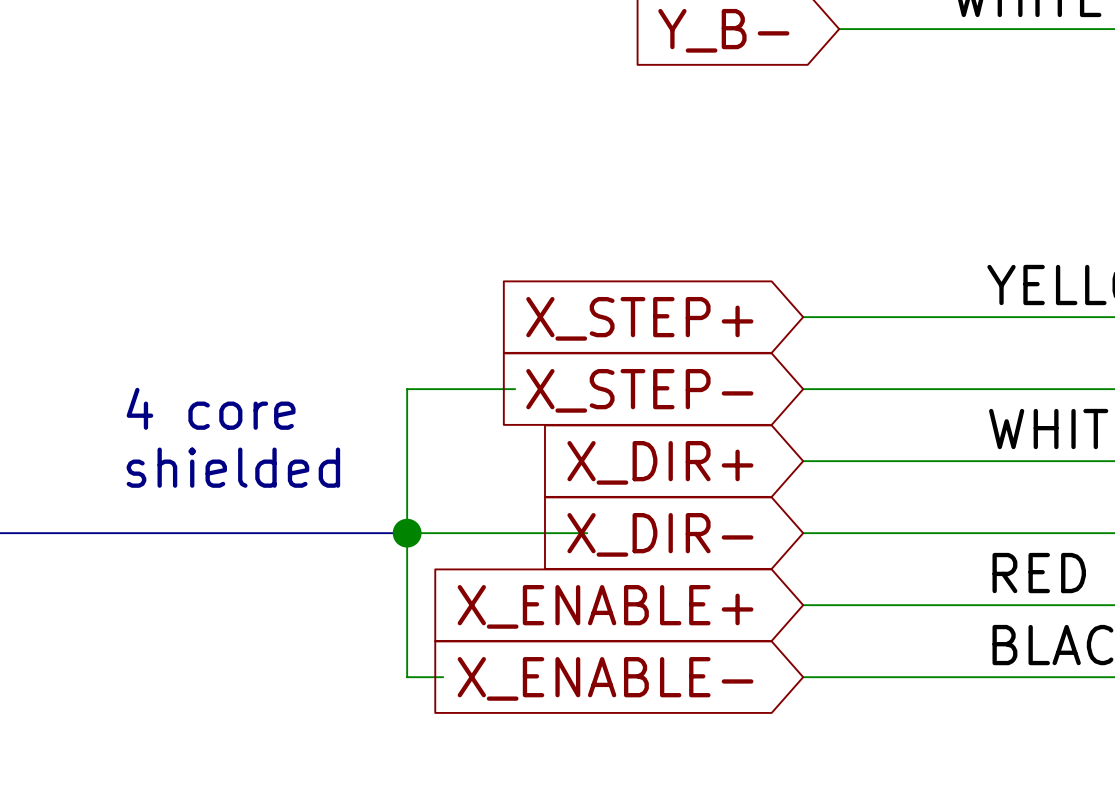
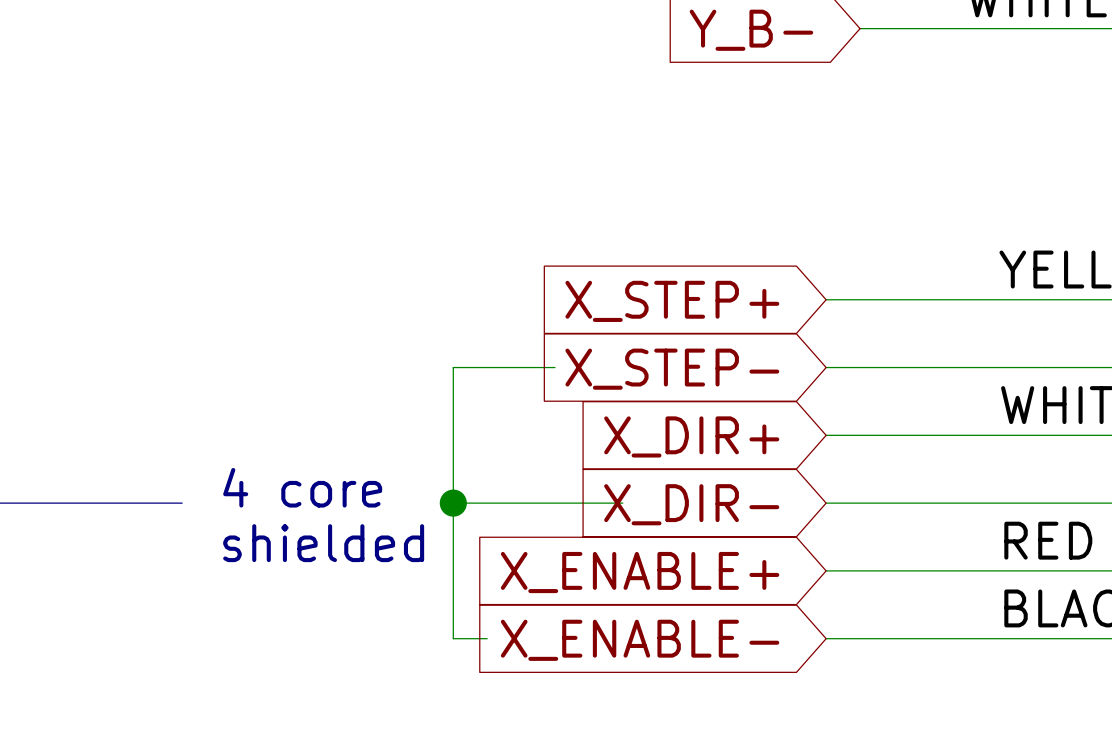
text position: 4 core (211, 408) -> 4 core (302, 487)
text position: shielded (233, 467) -> shielded (323, 543)
bus: (119, 533) (407, 533) -> none

